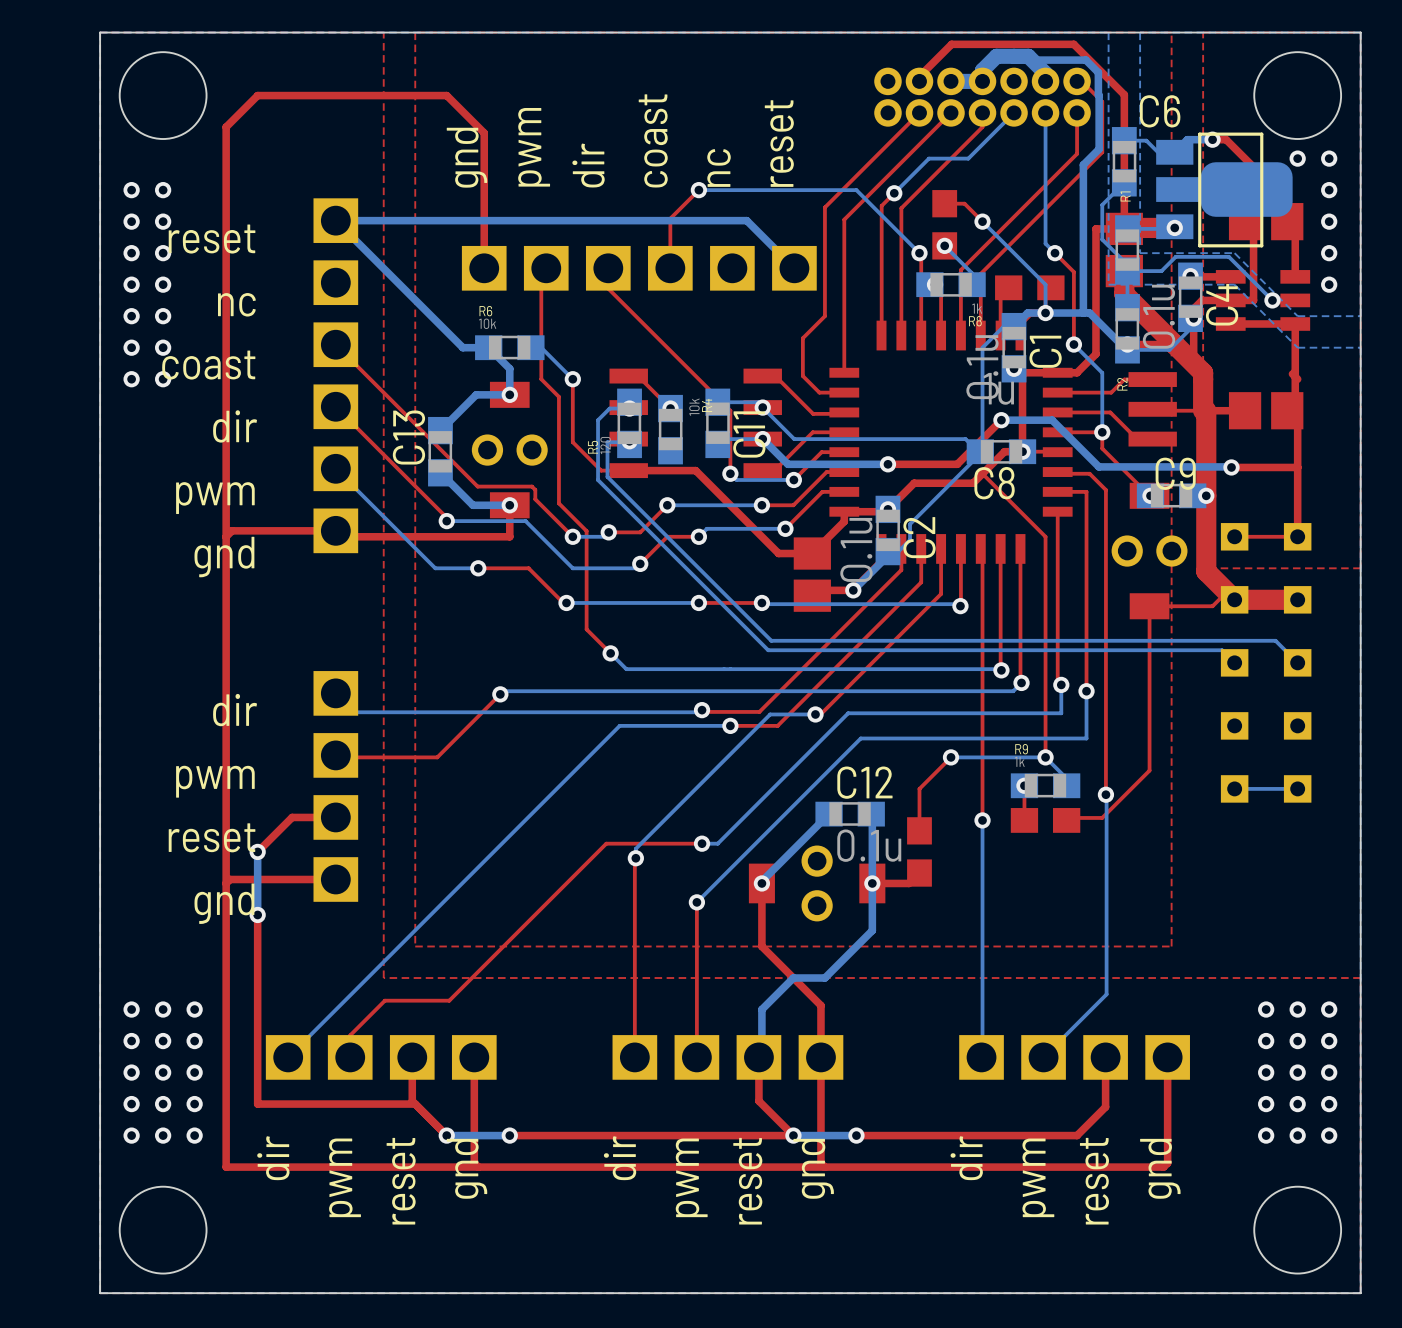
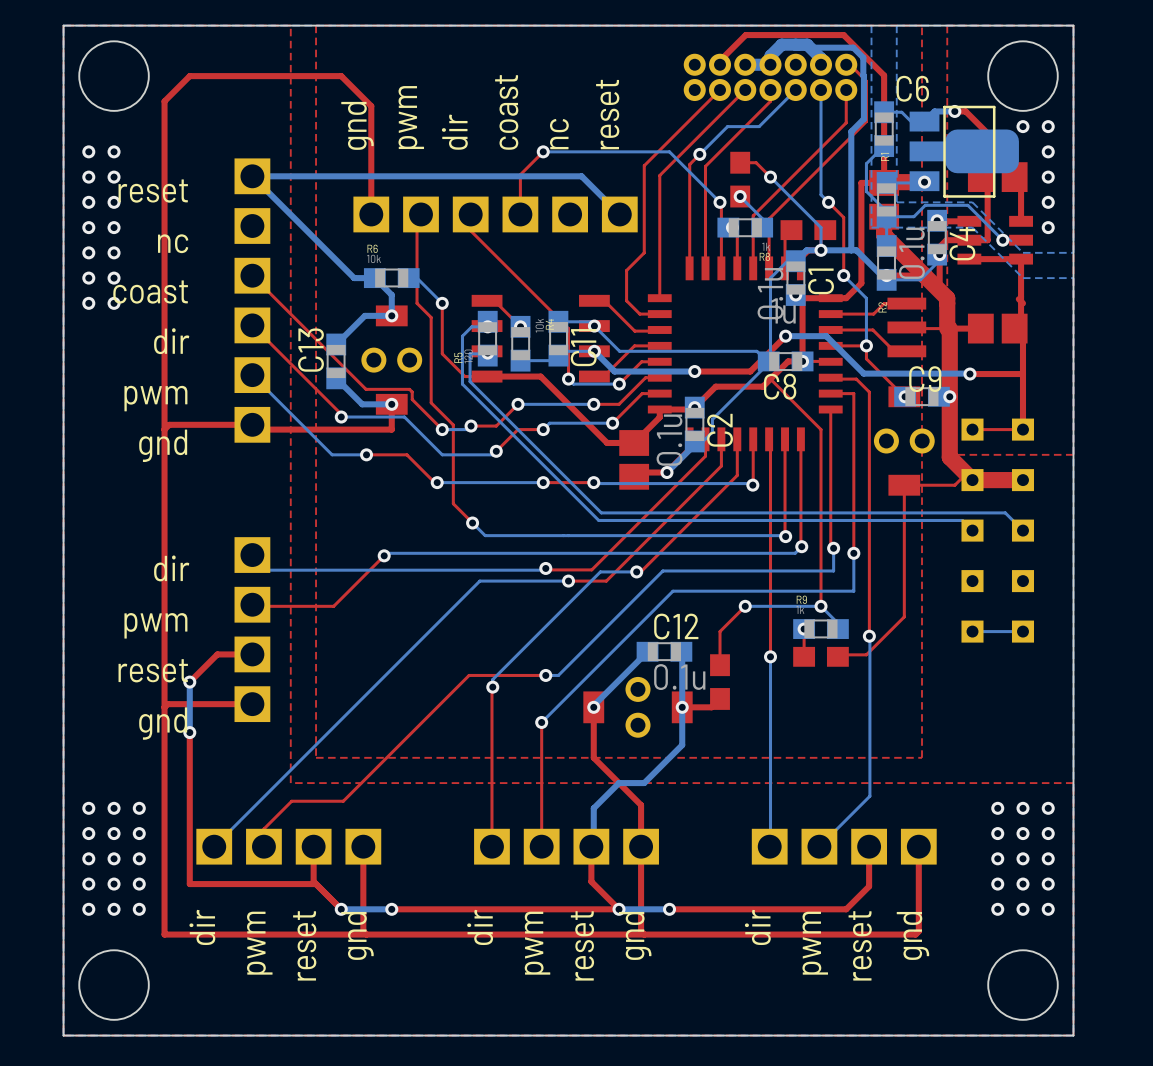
bottom track: none -> (558, 355) (553, 360) (520, 360)

